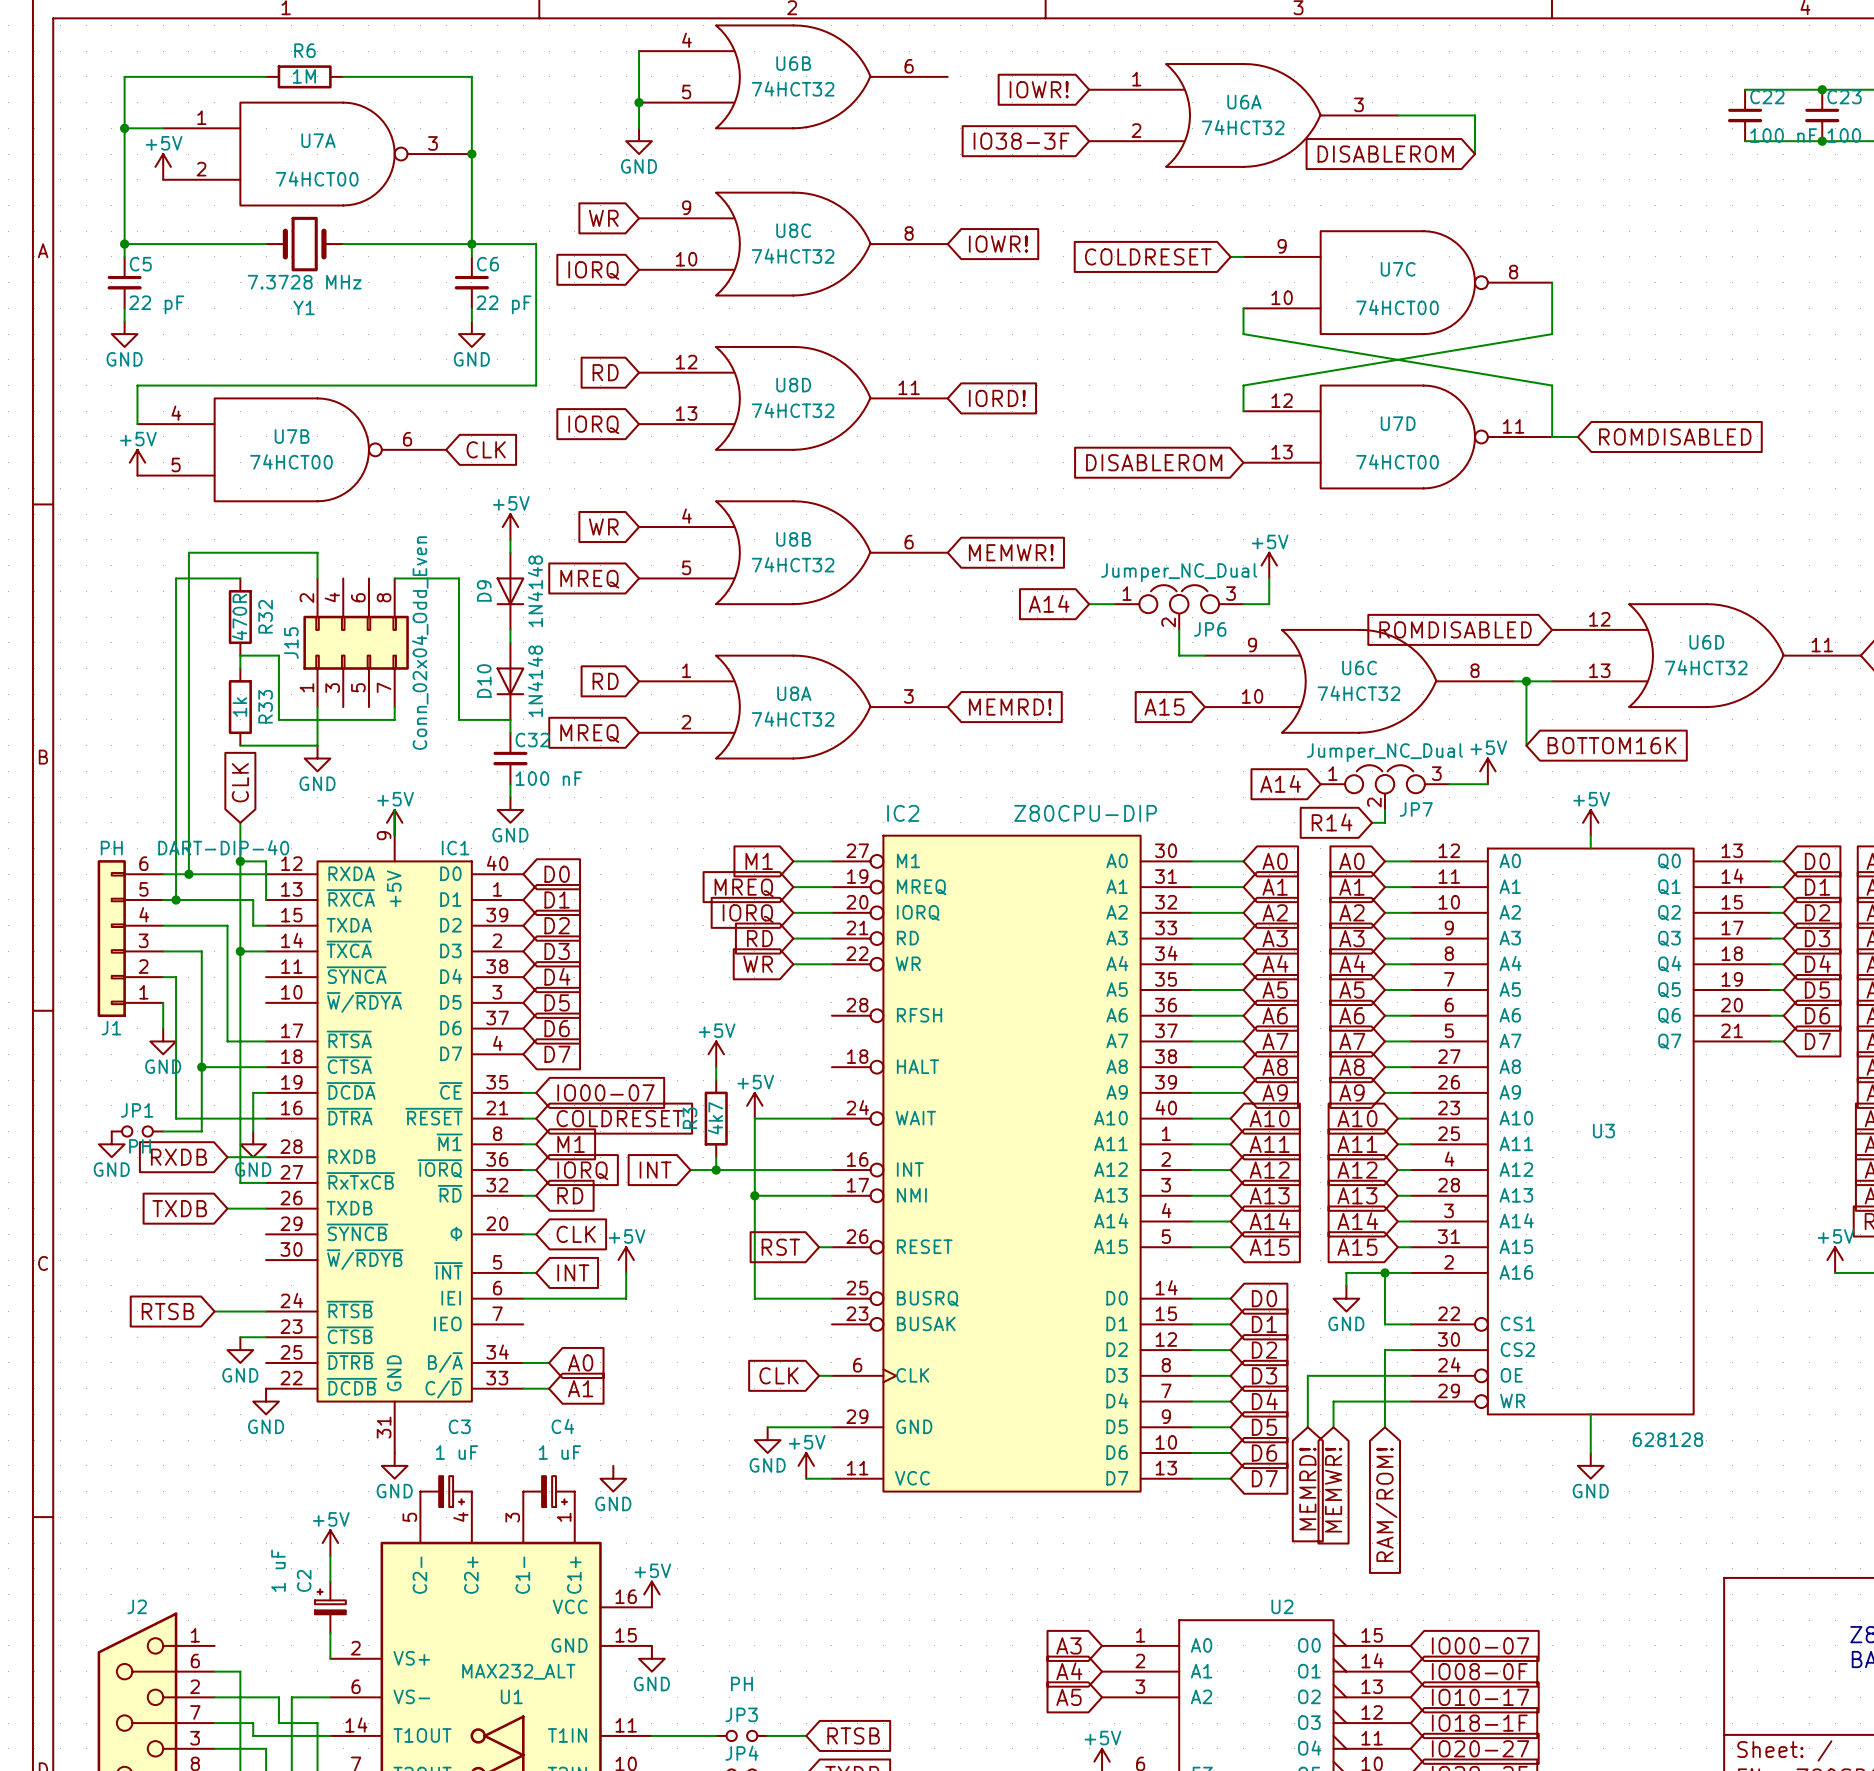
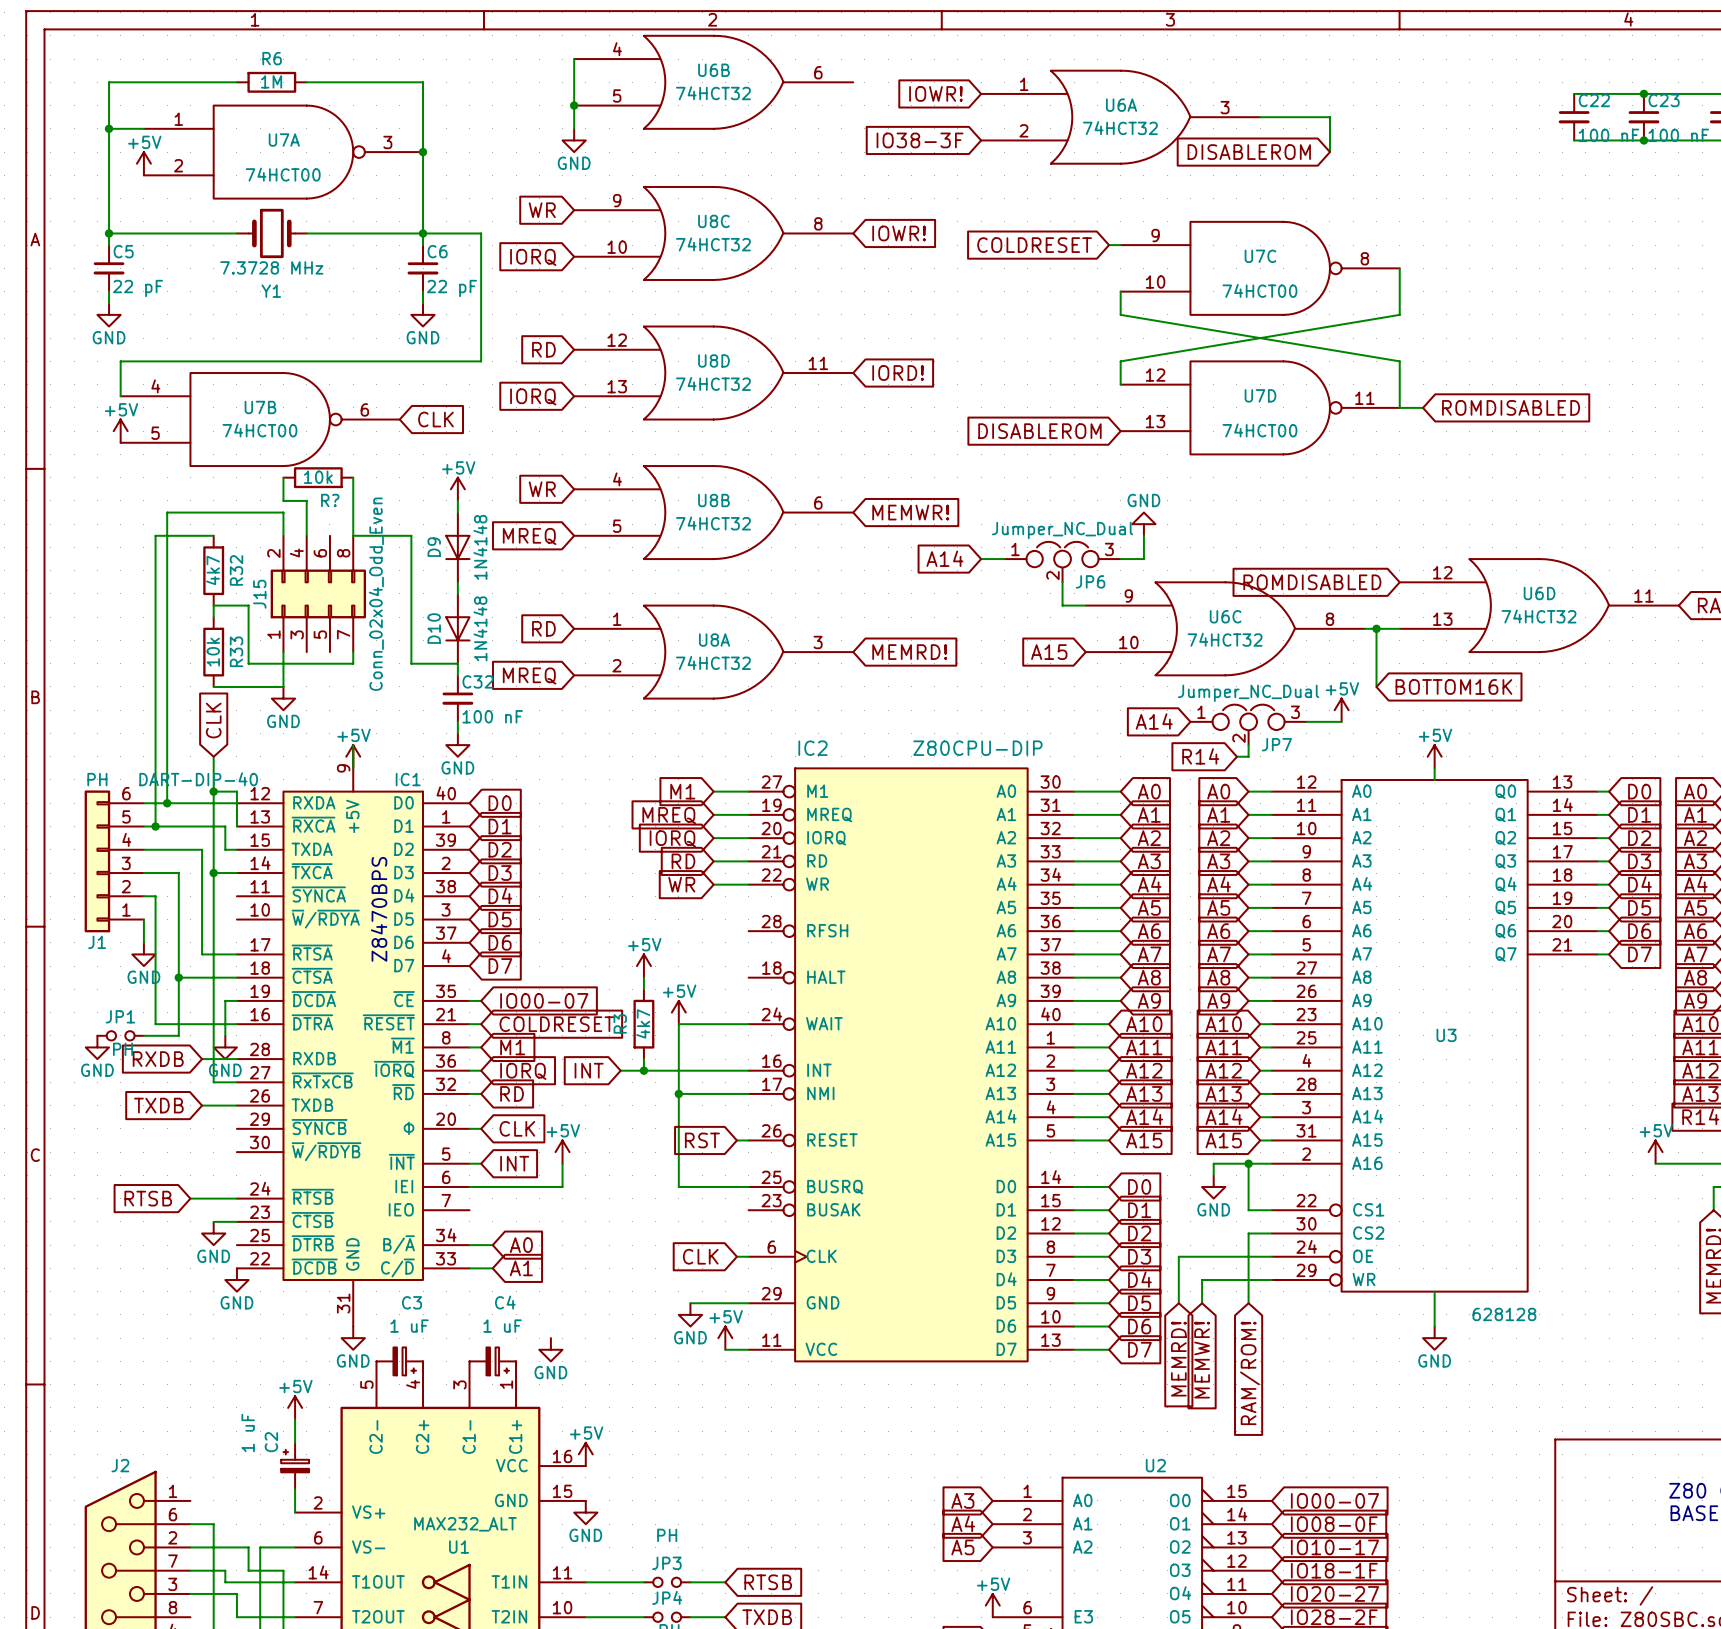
wire: none -> (283, 477) (283, 500) (306, 500) (306, 535)
R?: none -> 10k (318, 477)
wire: none -> (353, 477) (353, 535)
power symbol: +5V (1269, 565) -> GND (1143, 524)
R32 value: 470R (239, 617) -> 4k7 (212, 570)
R33 value: 1k (239, 707) -> 10k (213, 652)
text: none -> Z8470BPS (379, 909)

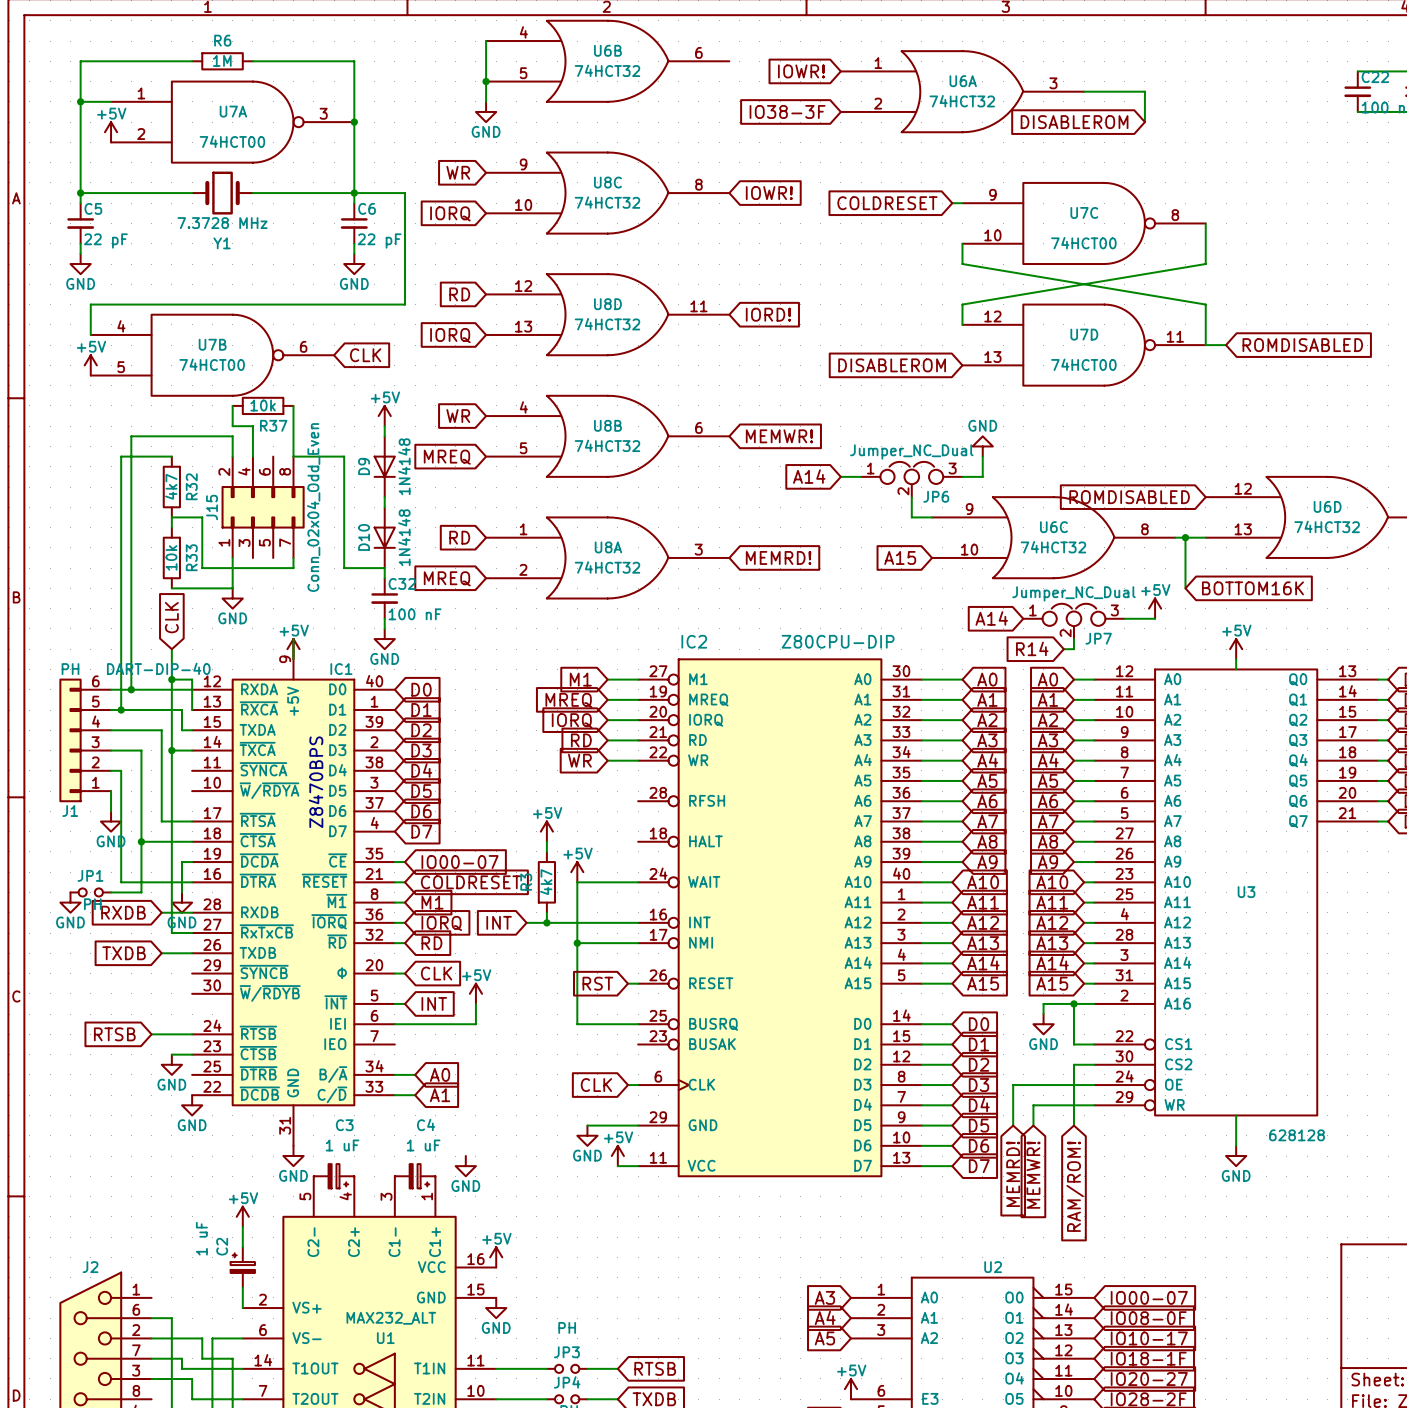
R? name: R? (330, 500) -> R37 (273, 425)

